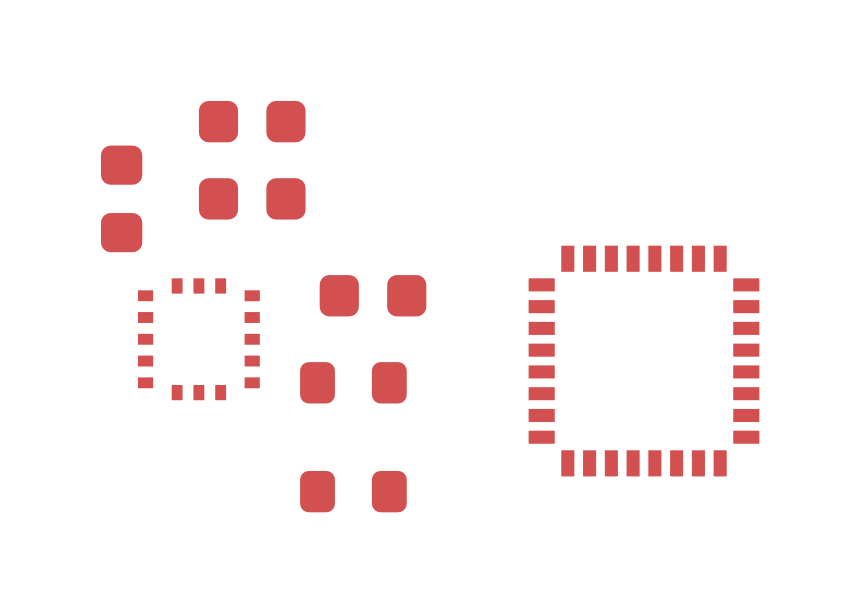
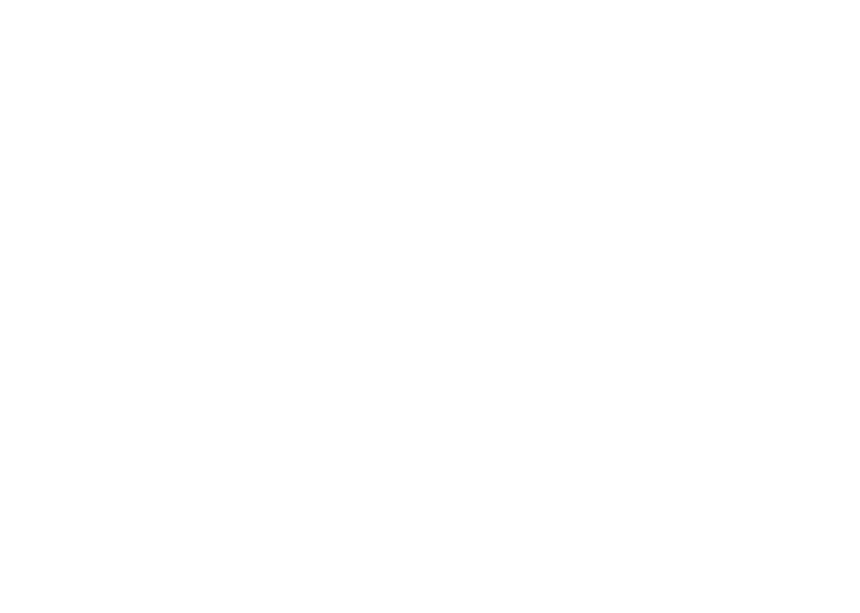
part: (252, 121) -> none
part: (121, 198) -> none
part: (252, 198) -> none
part: (373, 295) -> none
part: (198, 339) -> none
part: (643, 361) -> none
part: (353, 382) -> none
part: (353, 491) -> none

